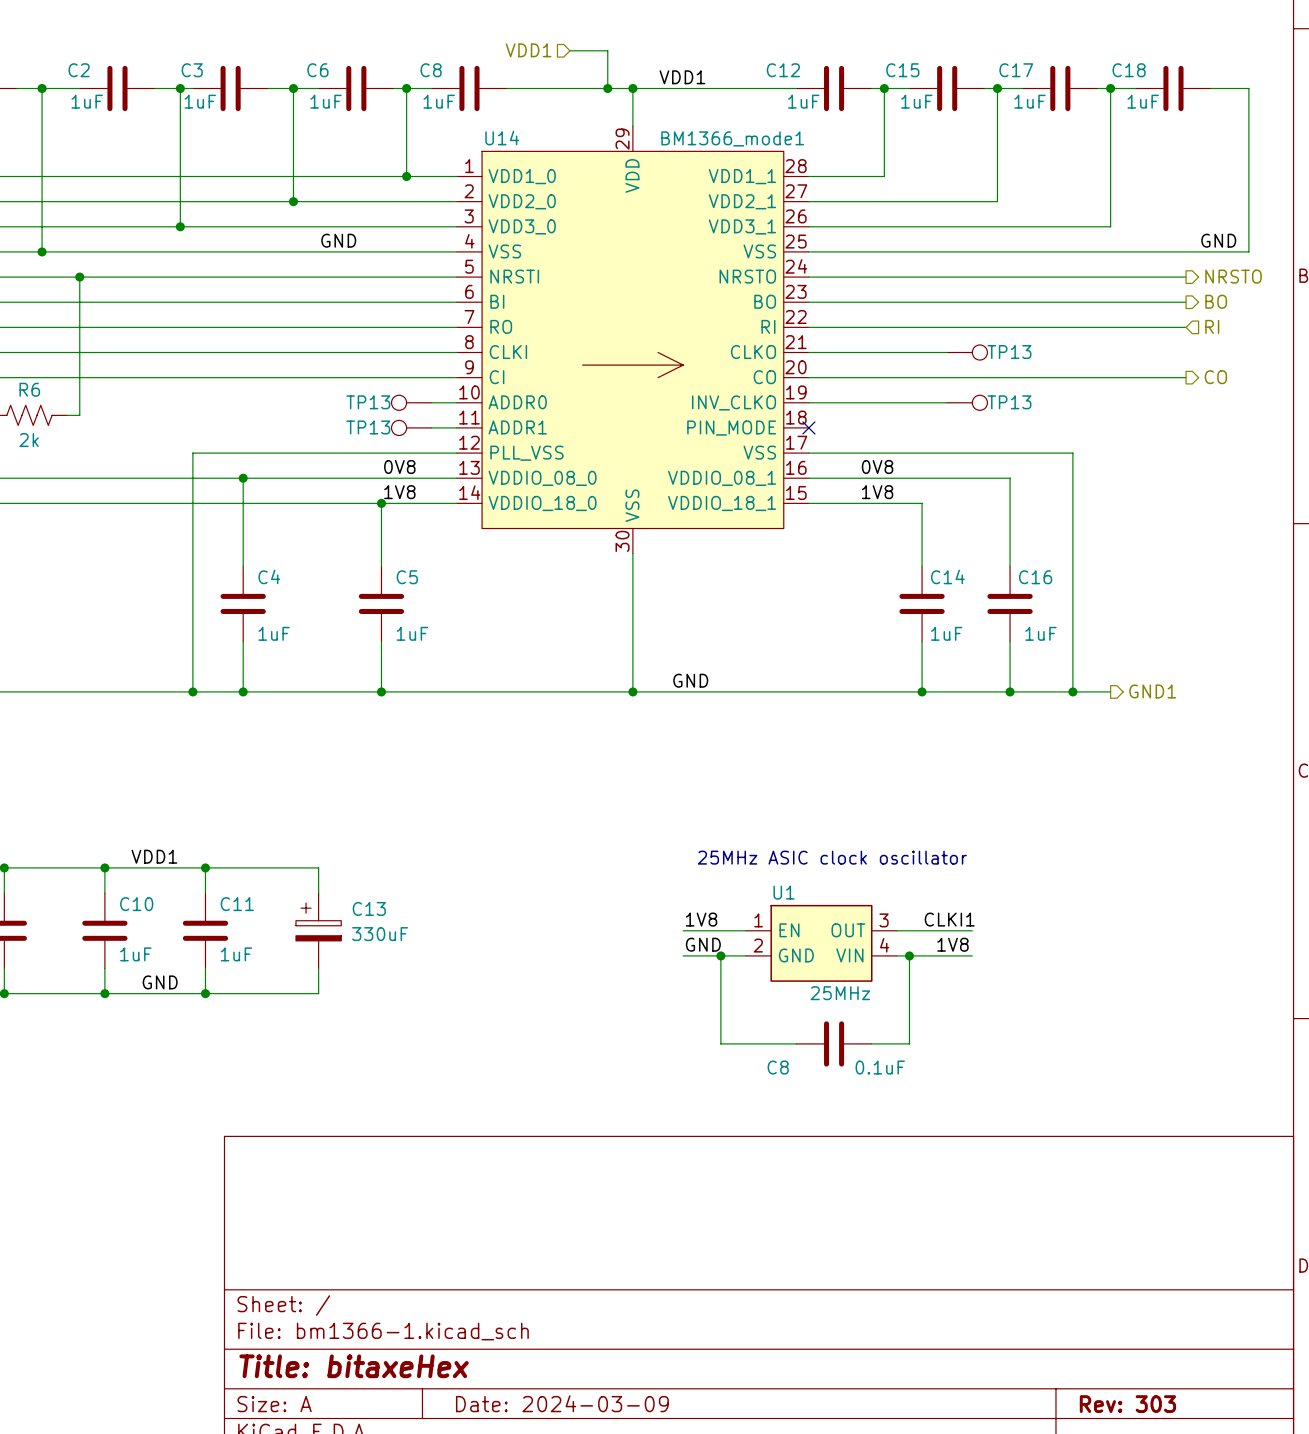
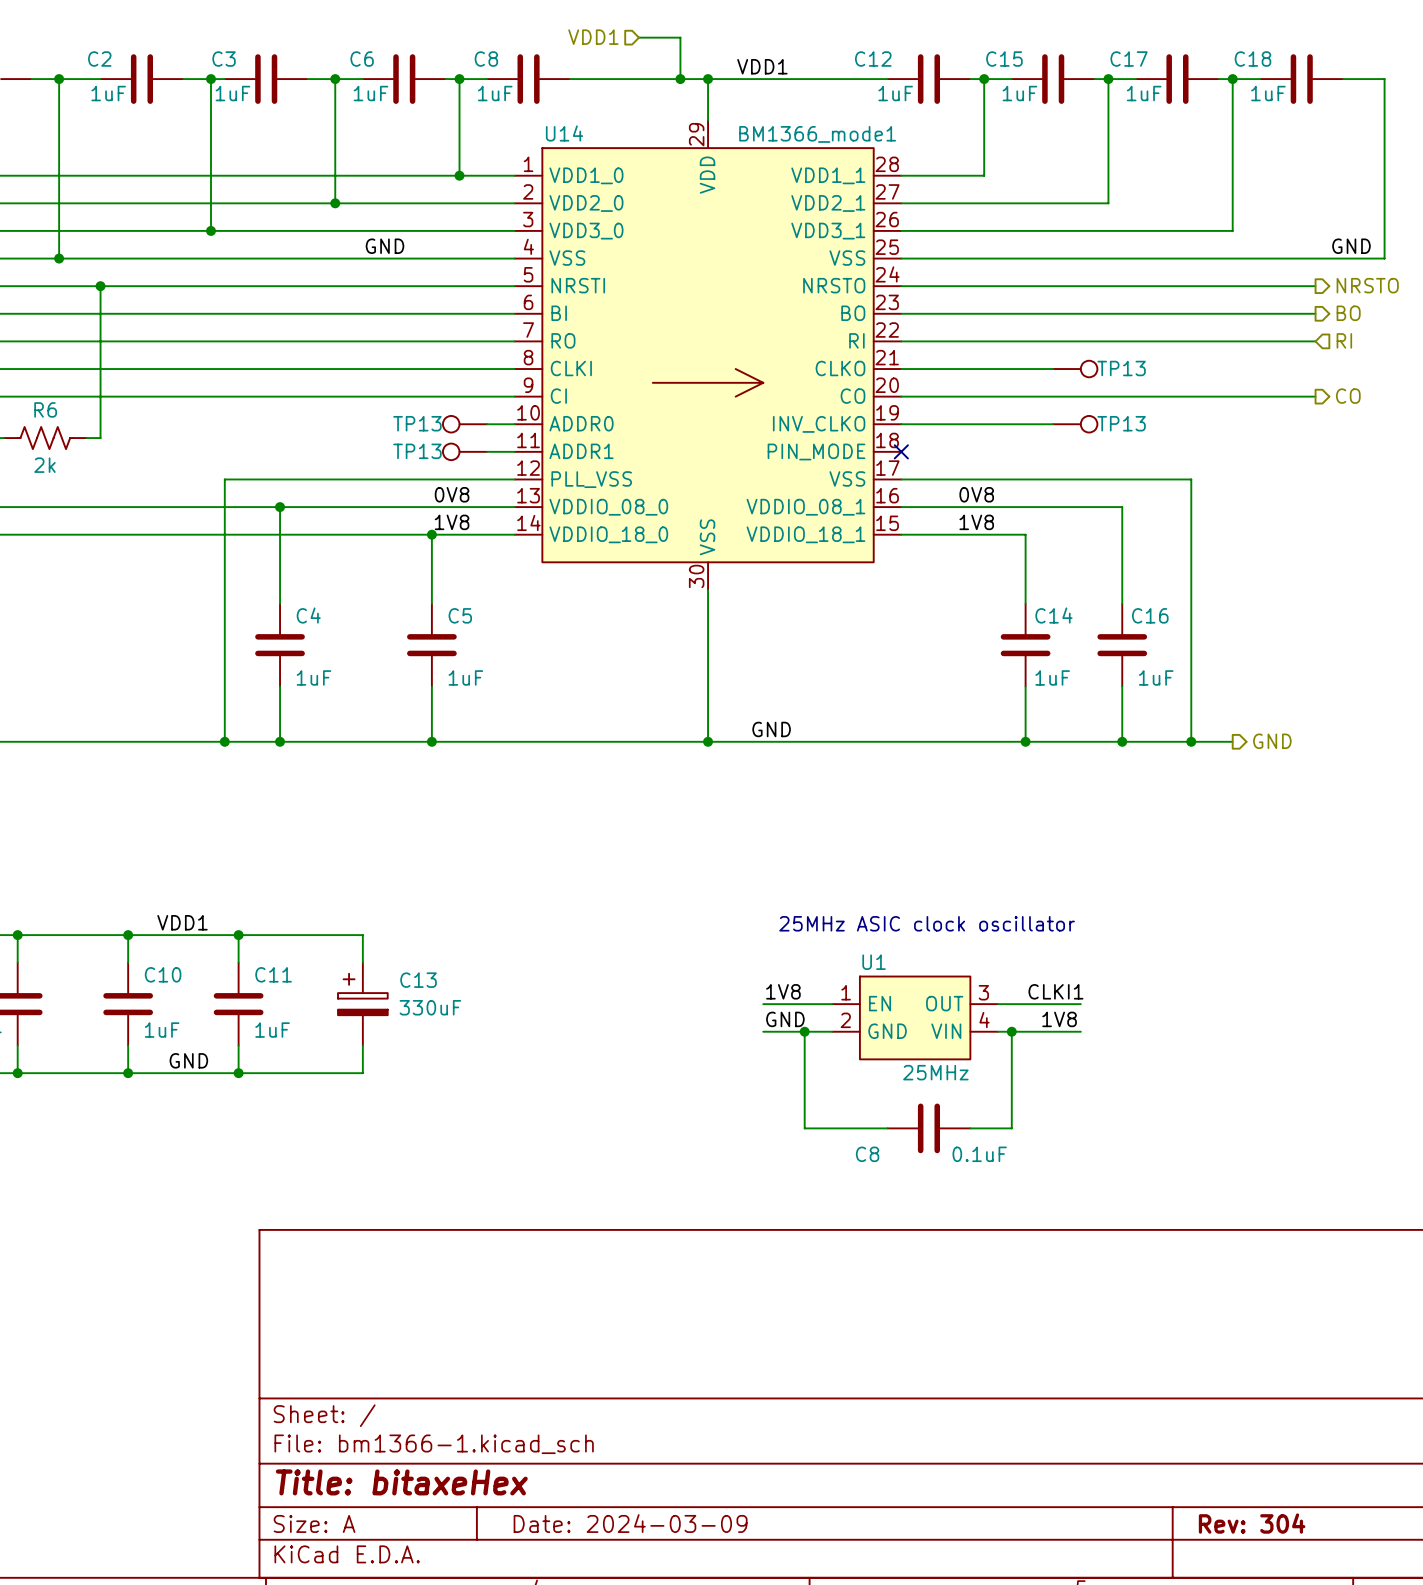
hierarchical label: GND1 (1152, 691) -> GND (1272, 741)
title block: Rev: 303 (1127, 1404) -> Rev: 304 (1252, 1523)

